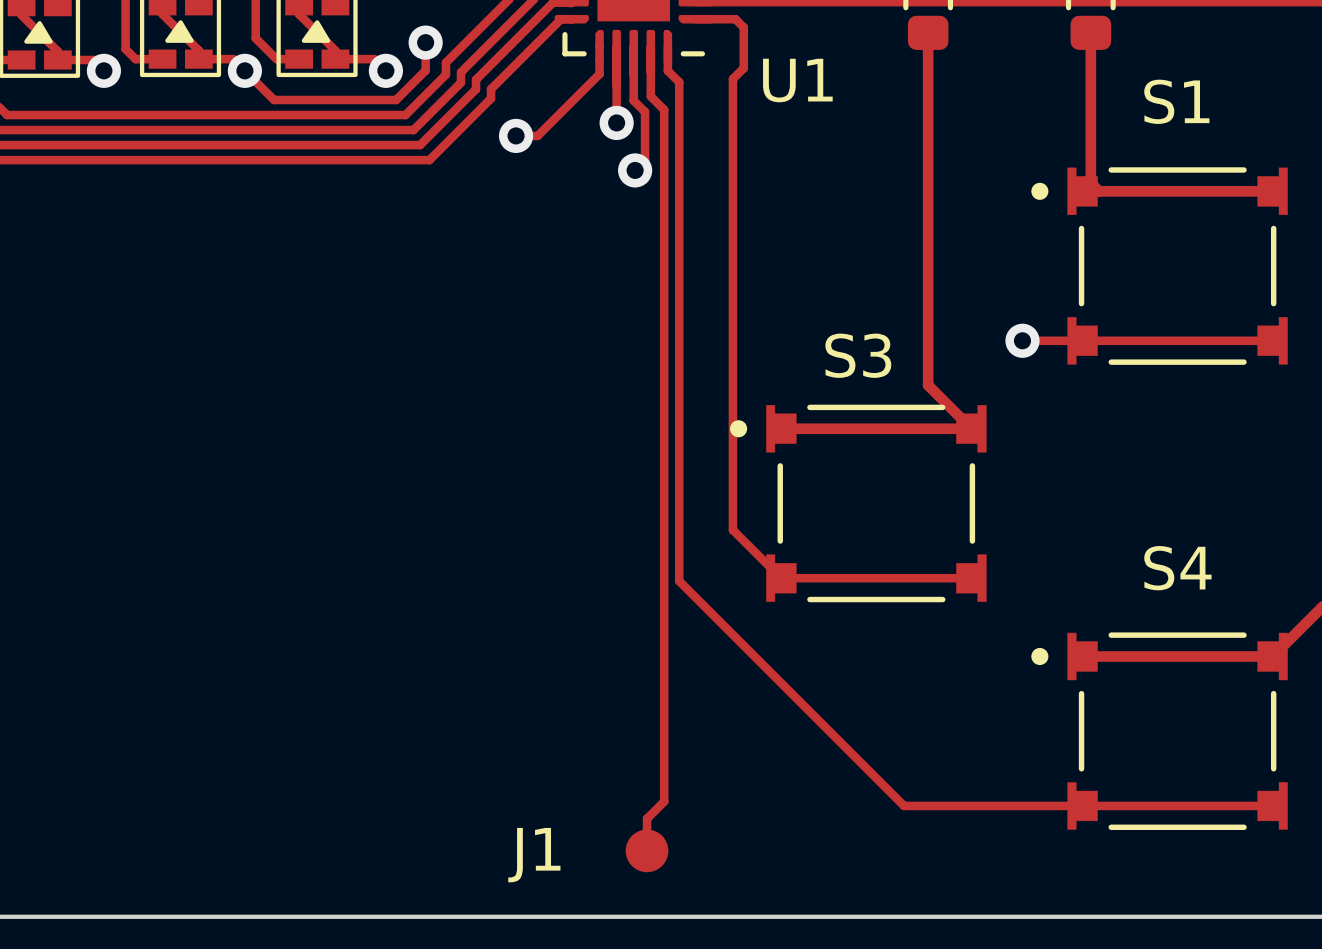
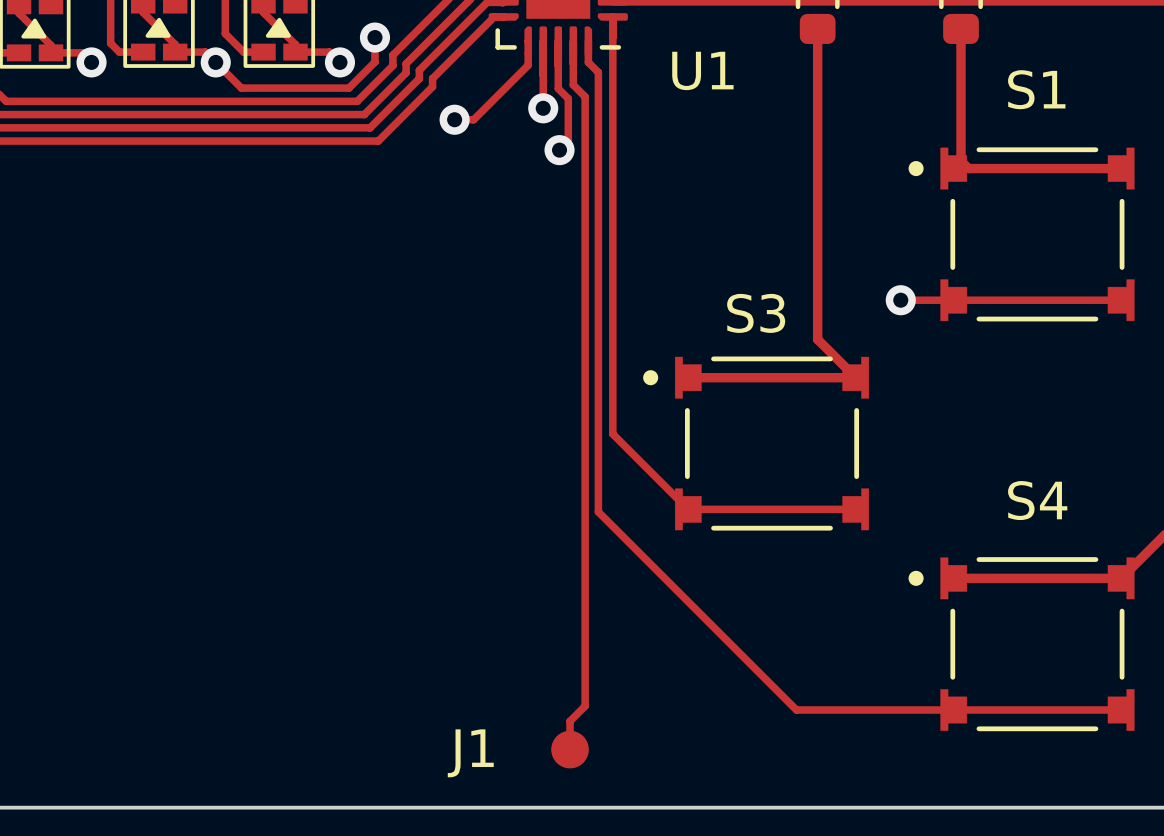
track: (695, 19) (735, 19) (743, 27) (743, 68) (732, 79) (732, 530) -> (612, 16) (612, 434) (645, 466)

